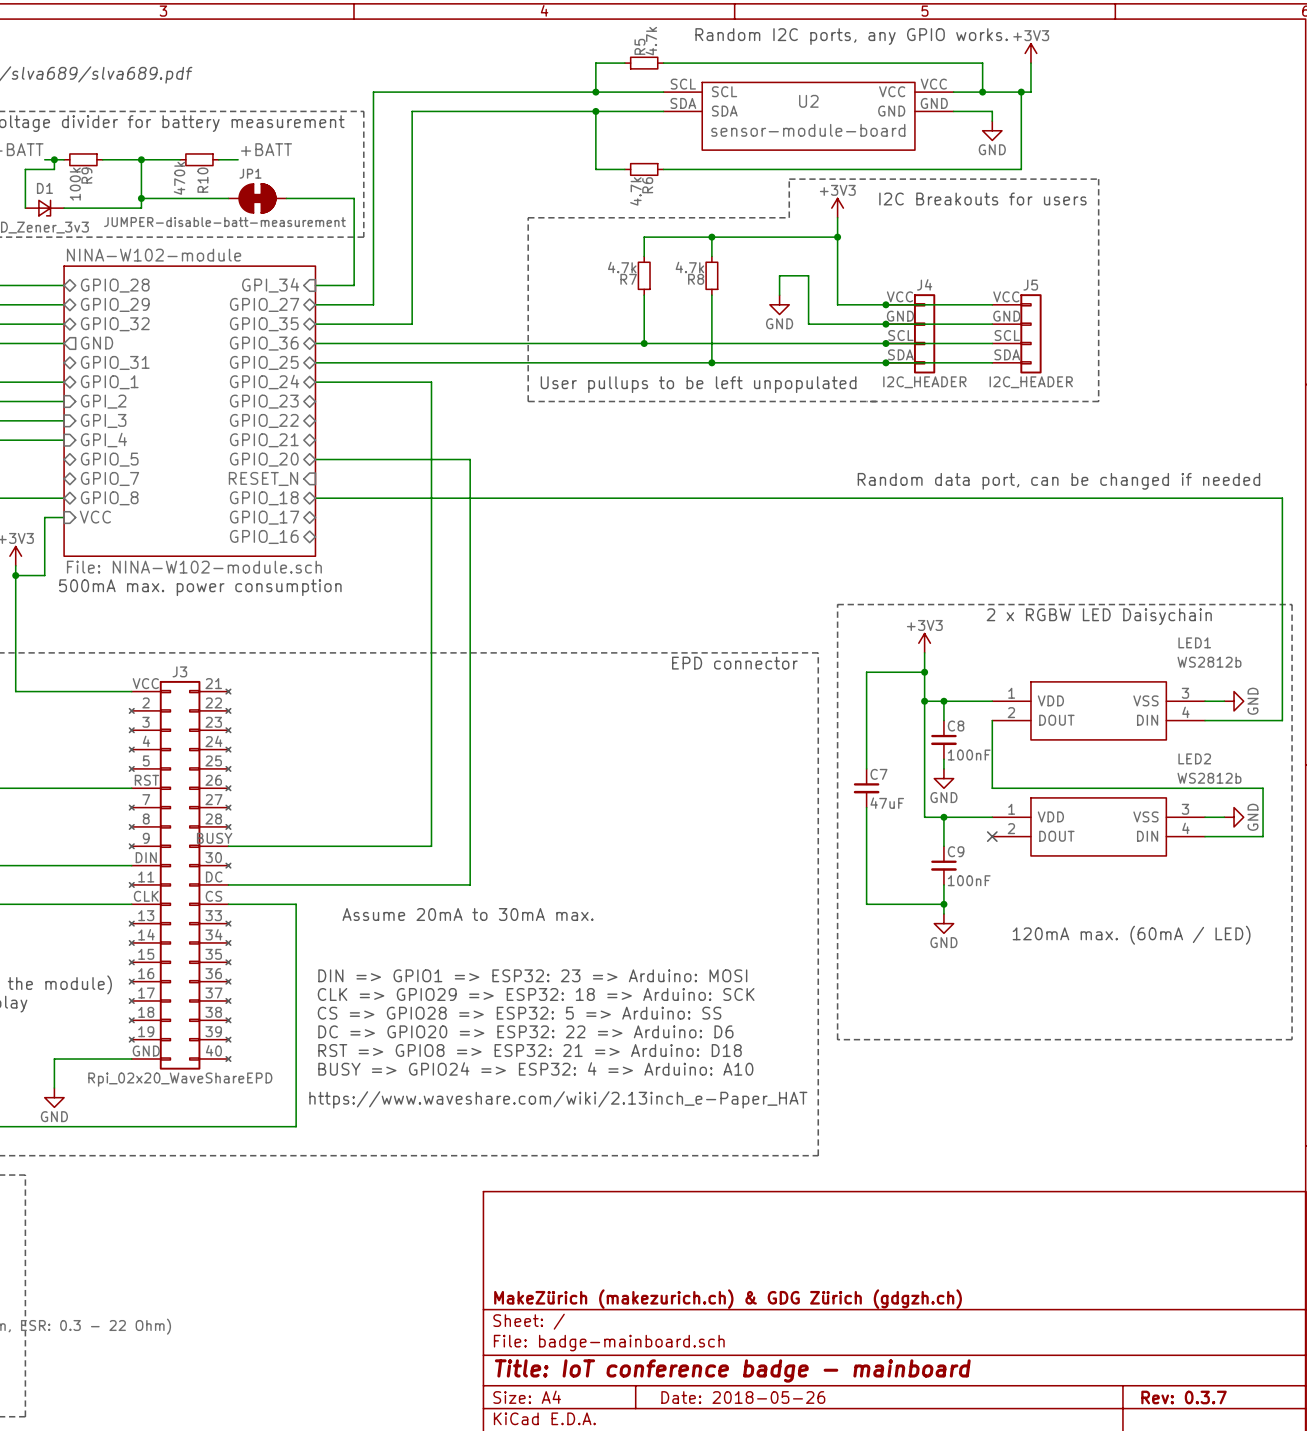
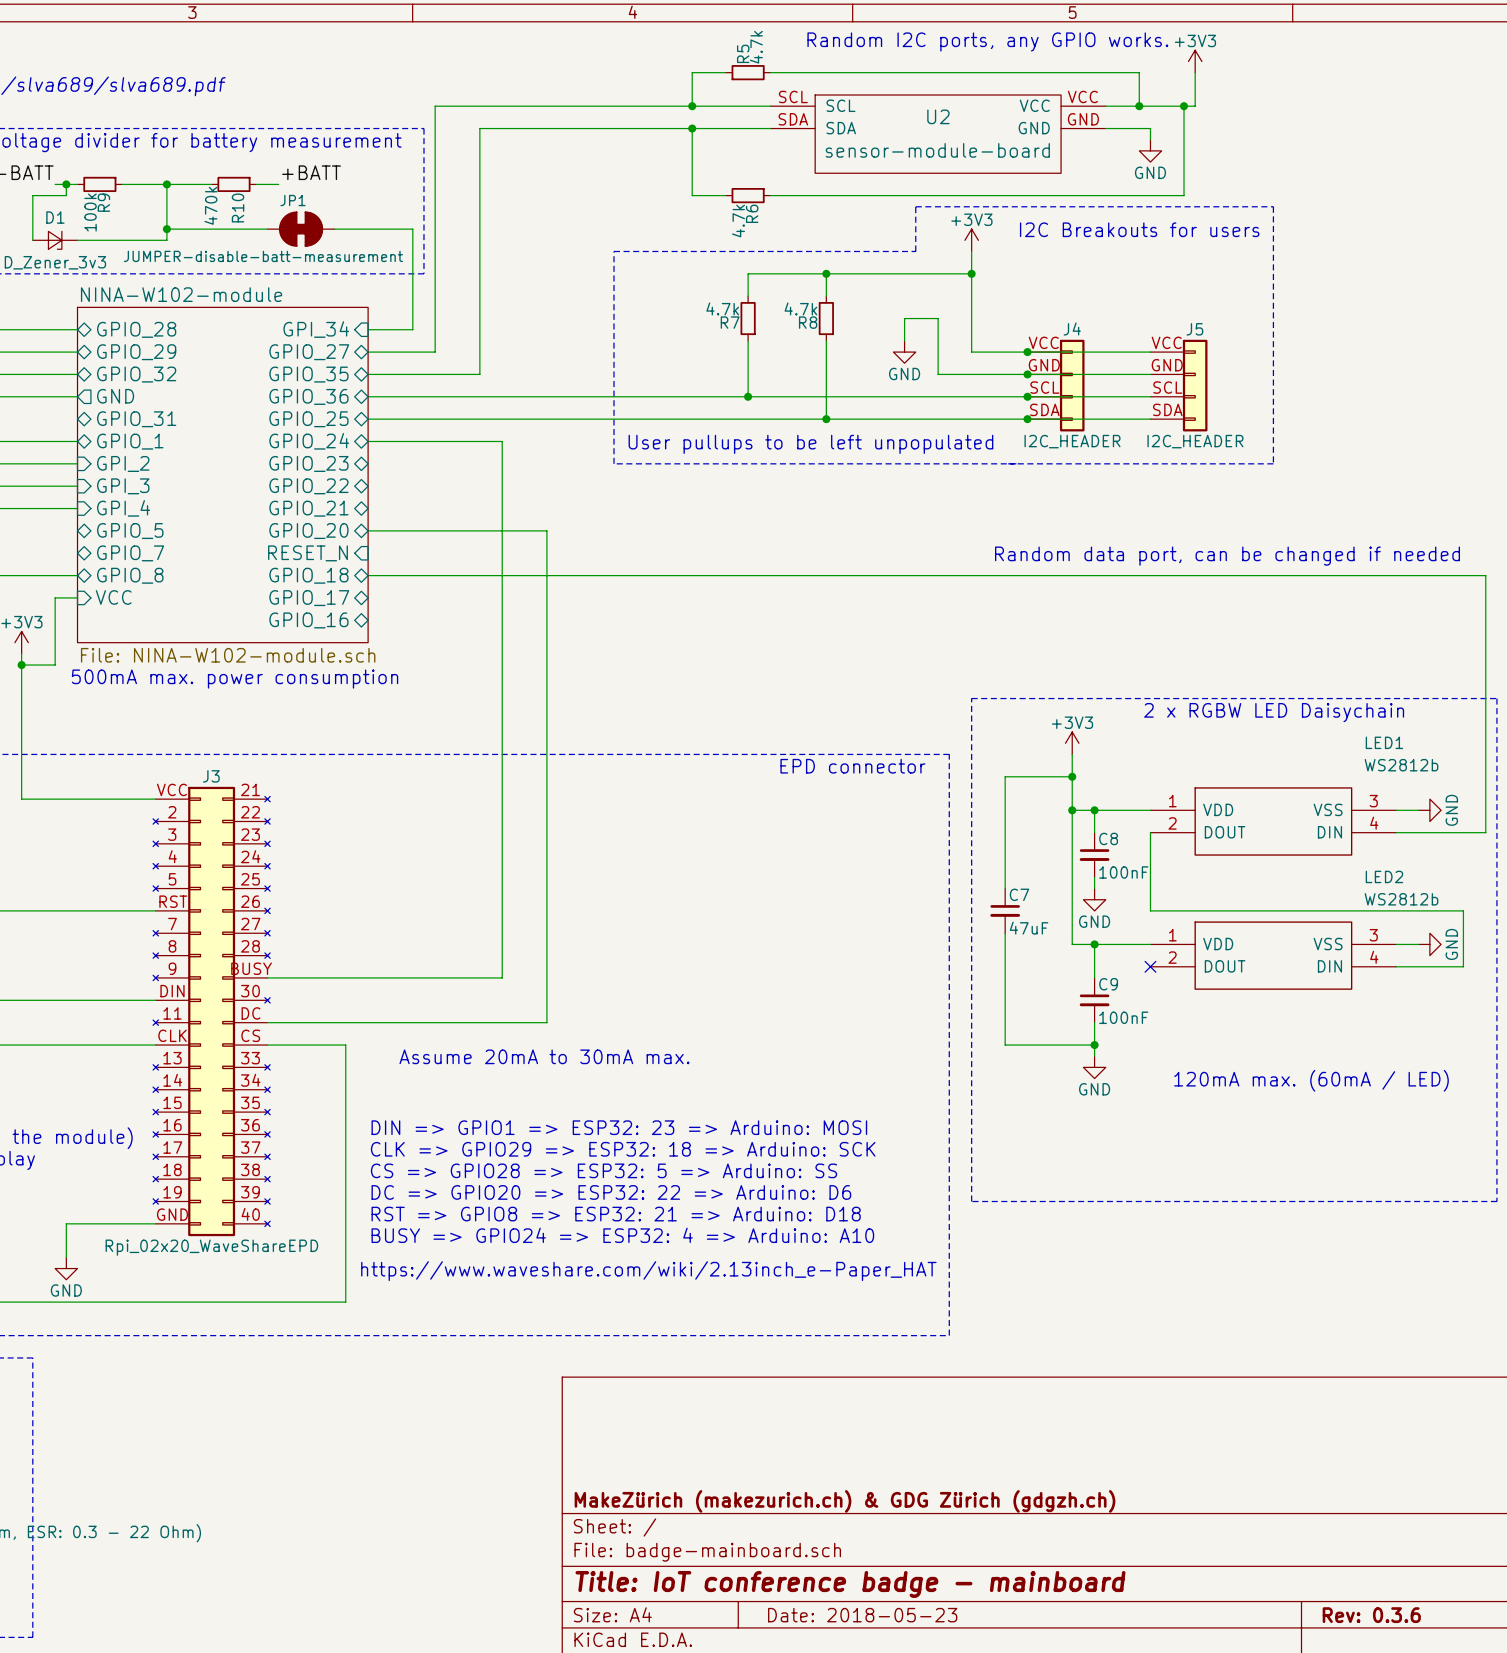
title block: Date: 2018-05-26 (743, 1397) -> Date: 2018-05-23 (862, 1615)
title block: Rev: 0.3.7 (1184, 1397) -> Rev: 0.3.6 (1371, 1615)

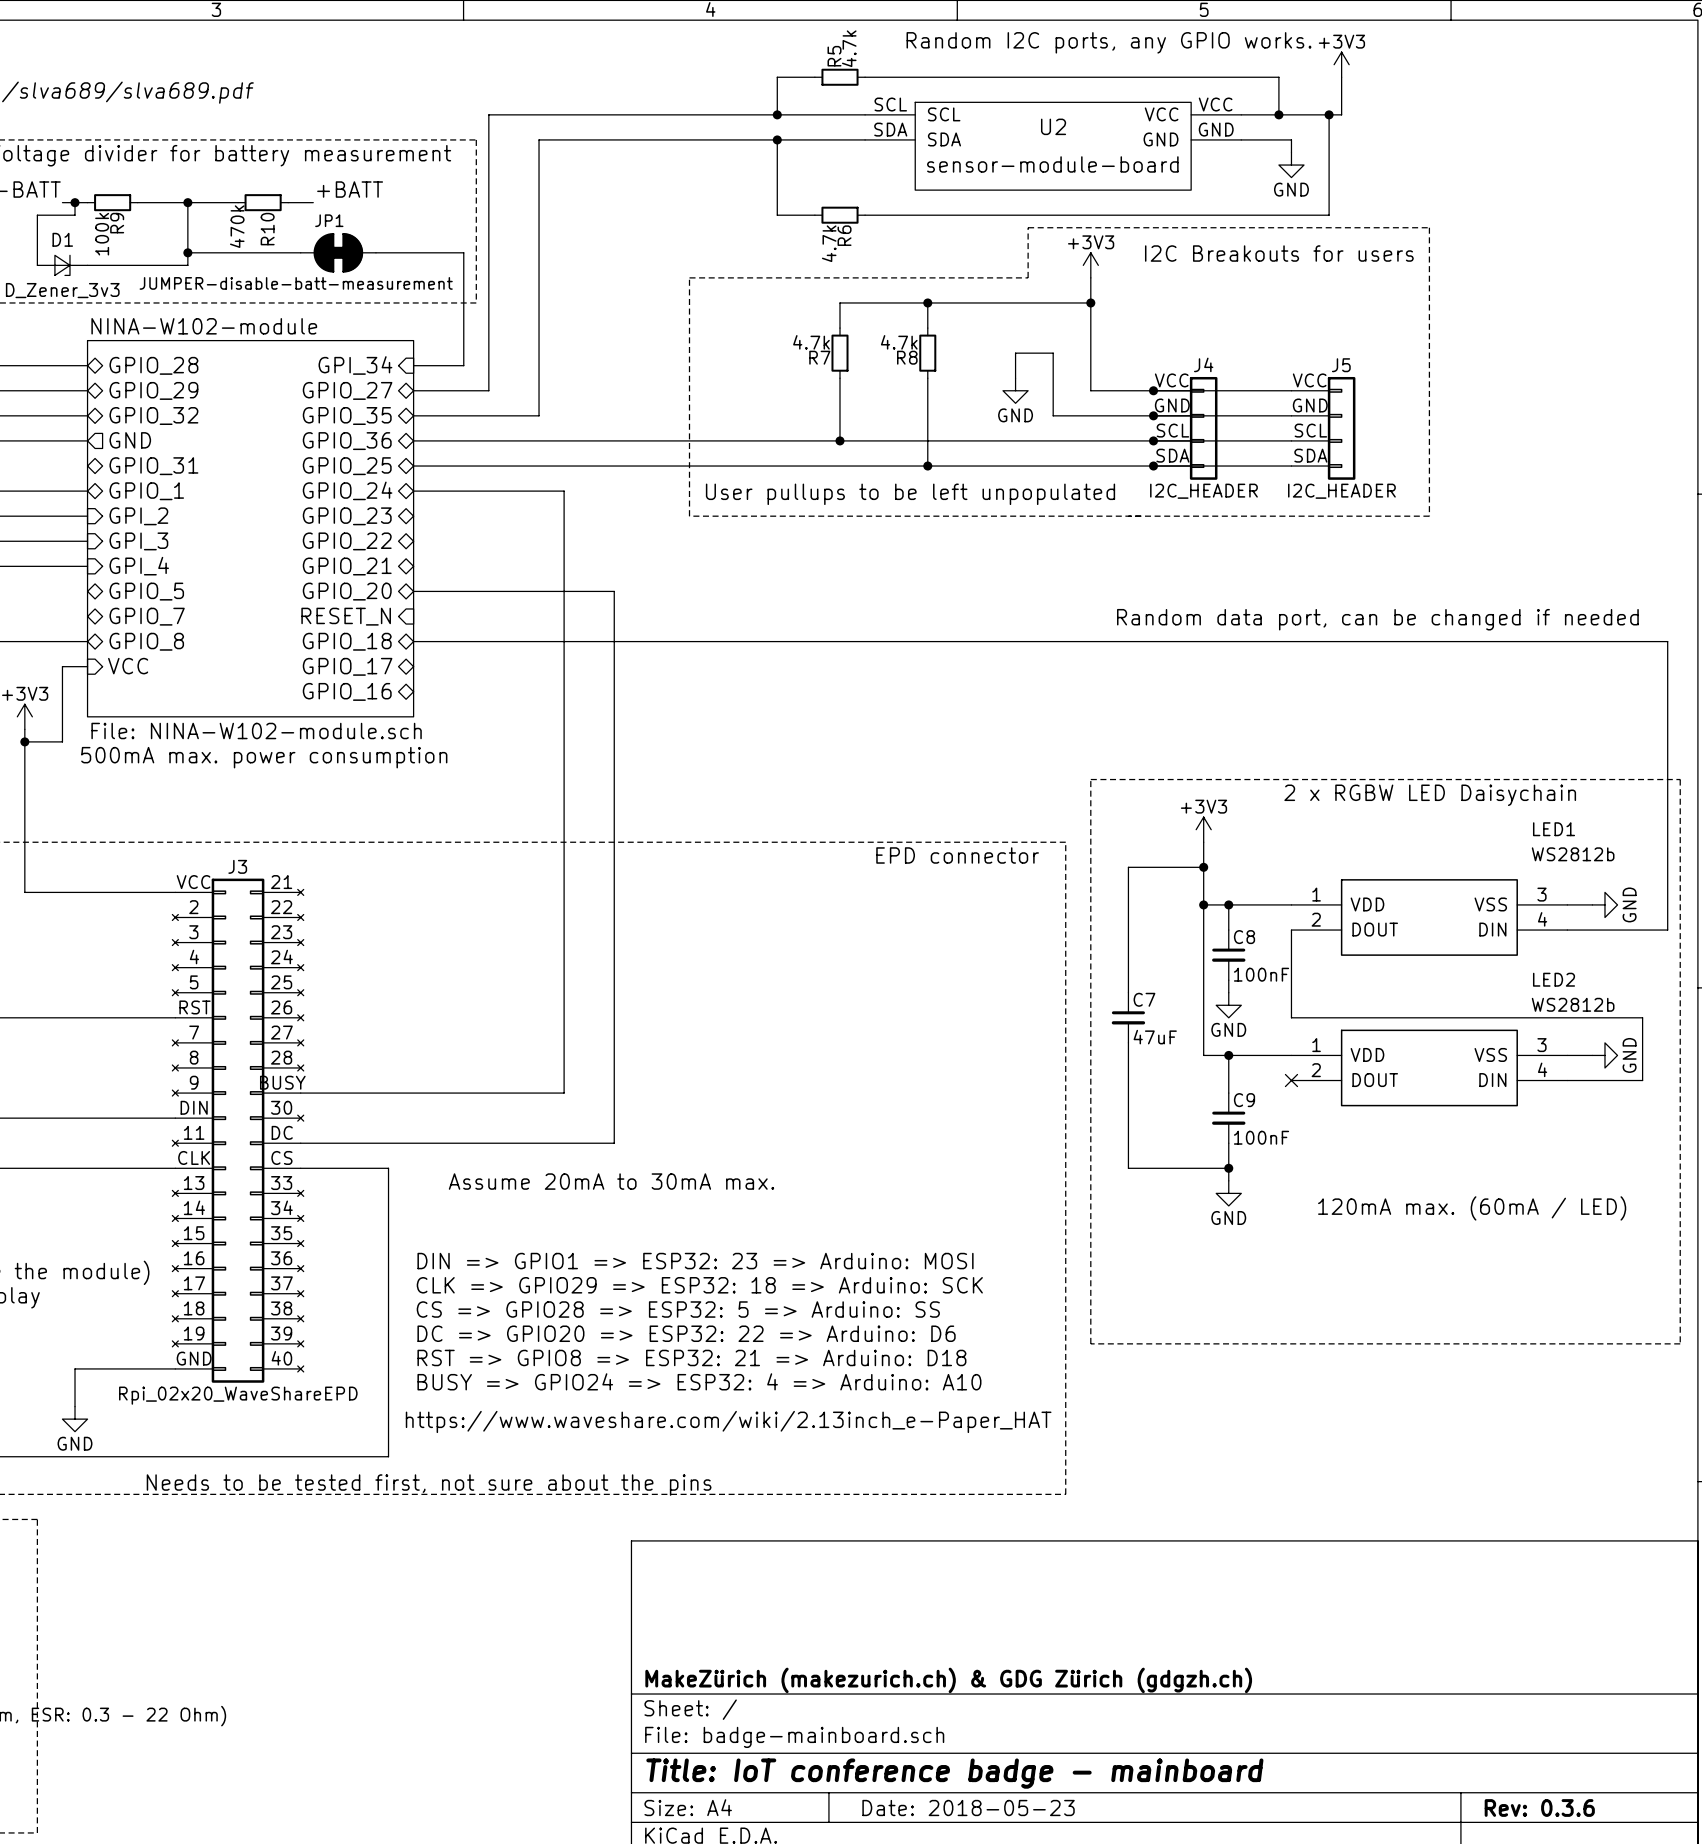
text: none -> Needs to be tested first, not sure about the pins (429, 1485)

